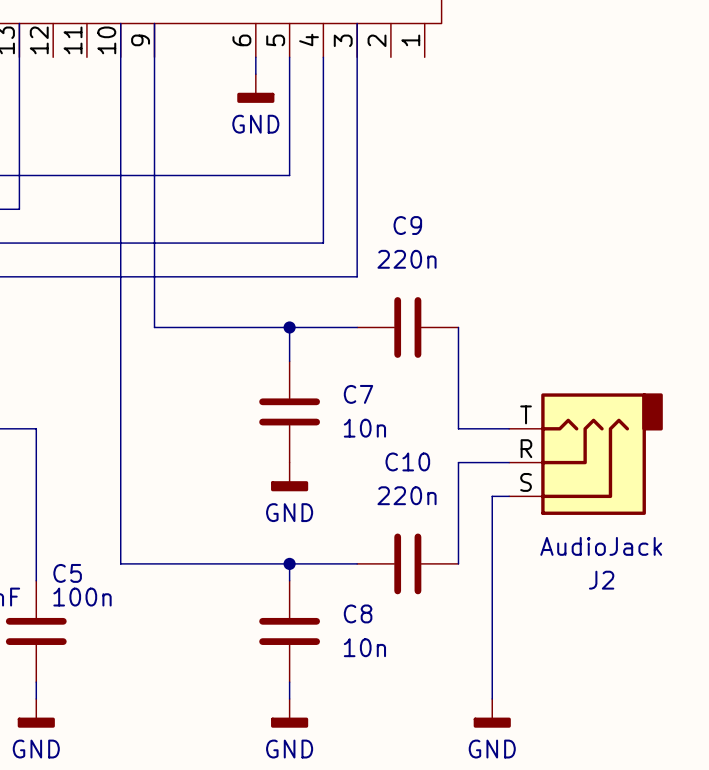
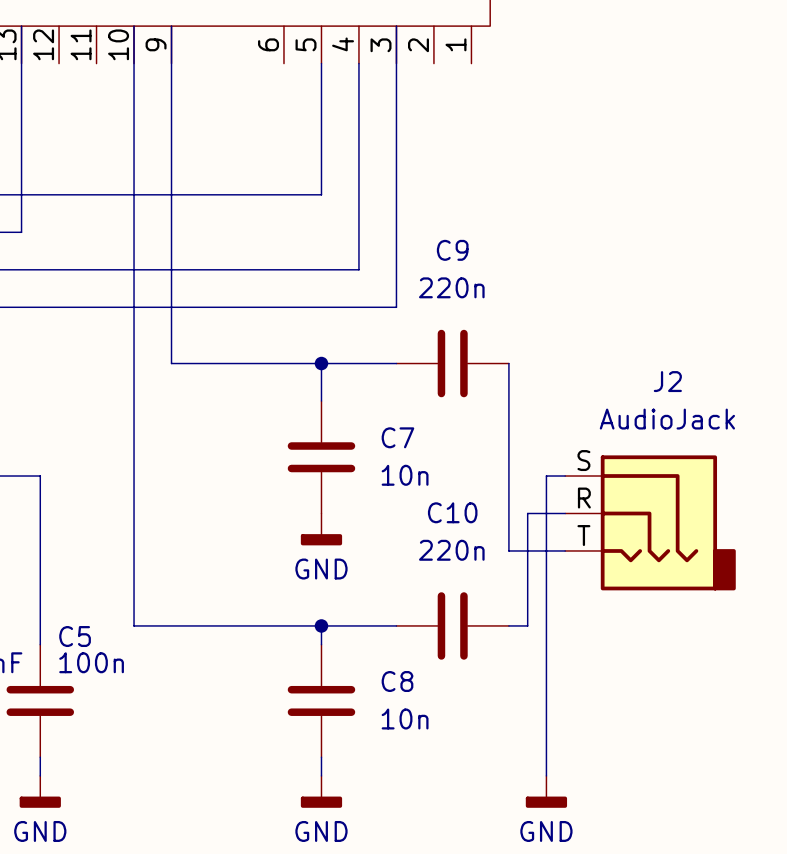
wire: (255, 57) (255, 74) -> none
power symbol: GND (255, 88) -> none
wire: (458, 428) (492, 428) -> (508, 550) (546, 550) (546, 476)
J2 flip: as is (602, 454) -> up-down (668, 522)
wire: (458, 462) (475, 462) -> (508, 513) (508, 476)
wire: (458, 496) (458, 563) -> (527, 513) (527, 625) (508, 625)

